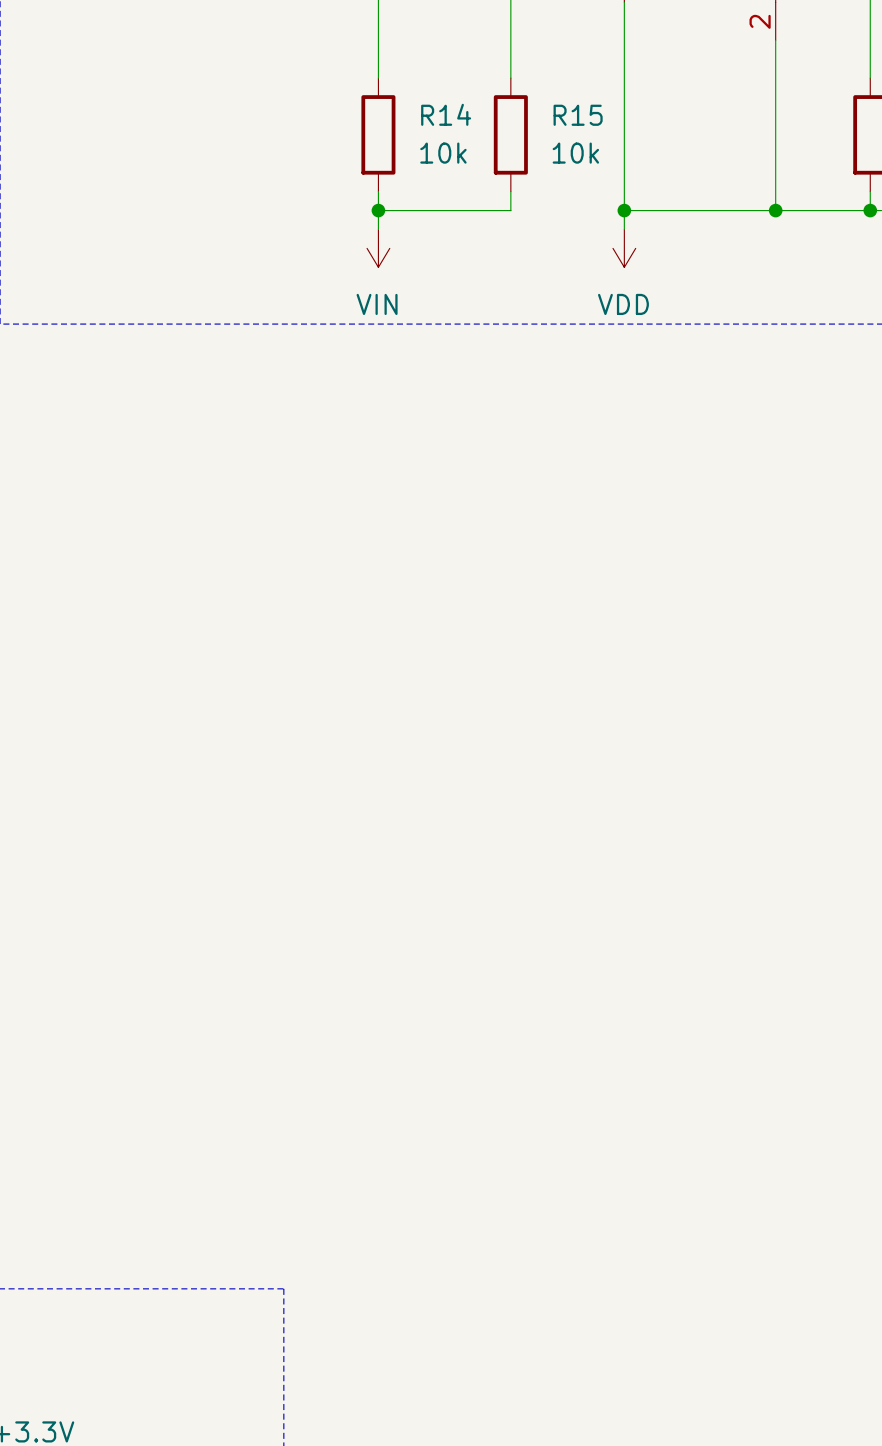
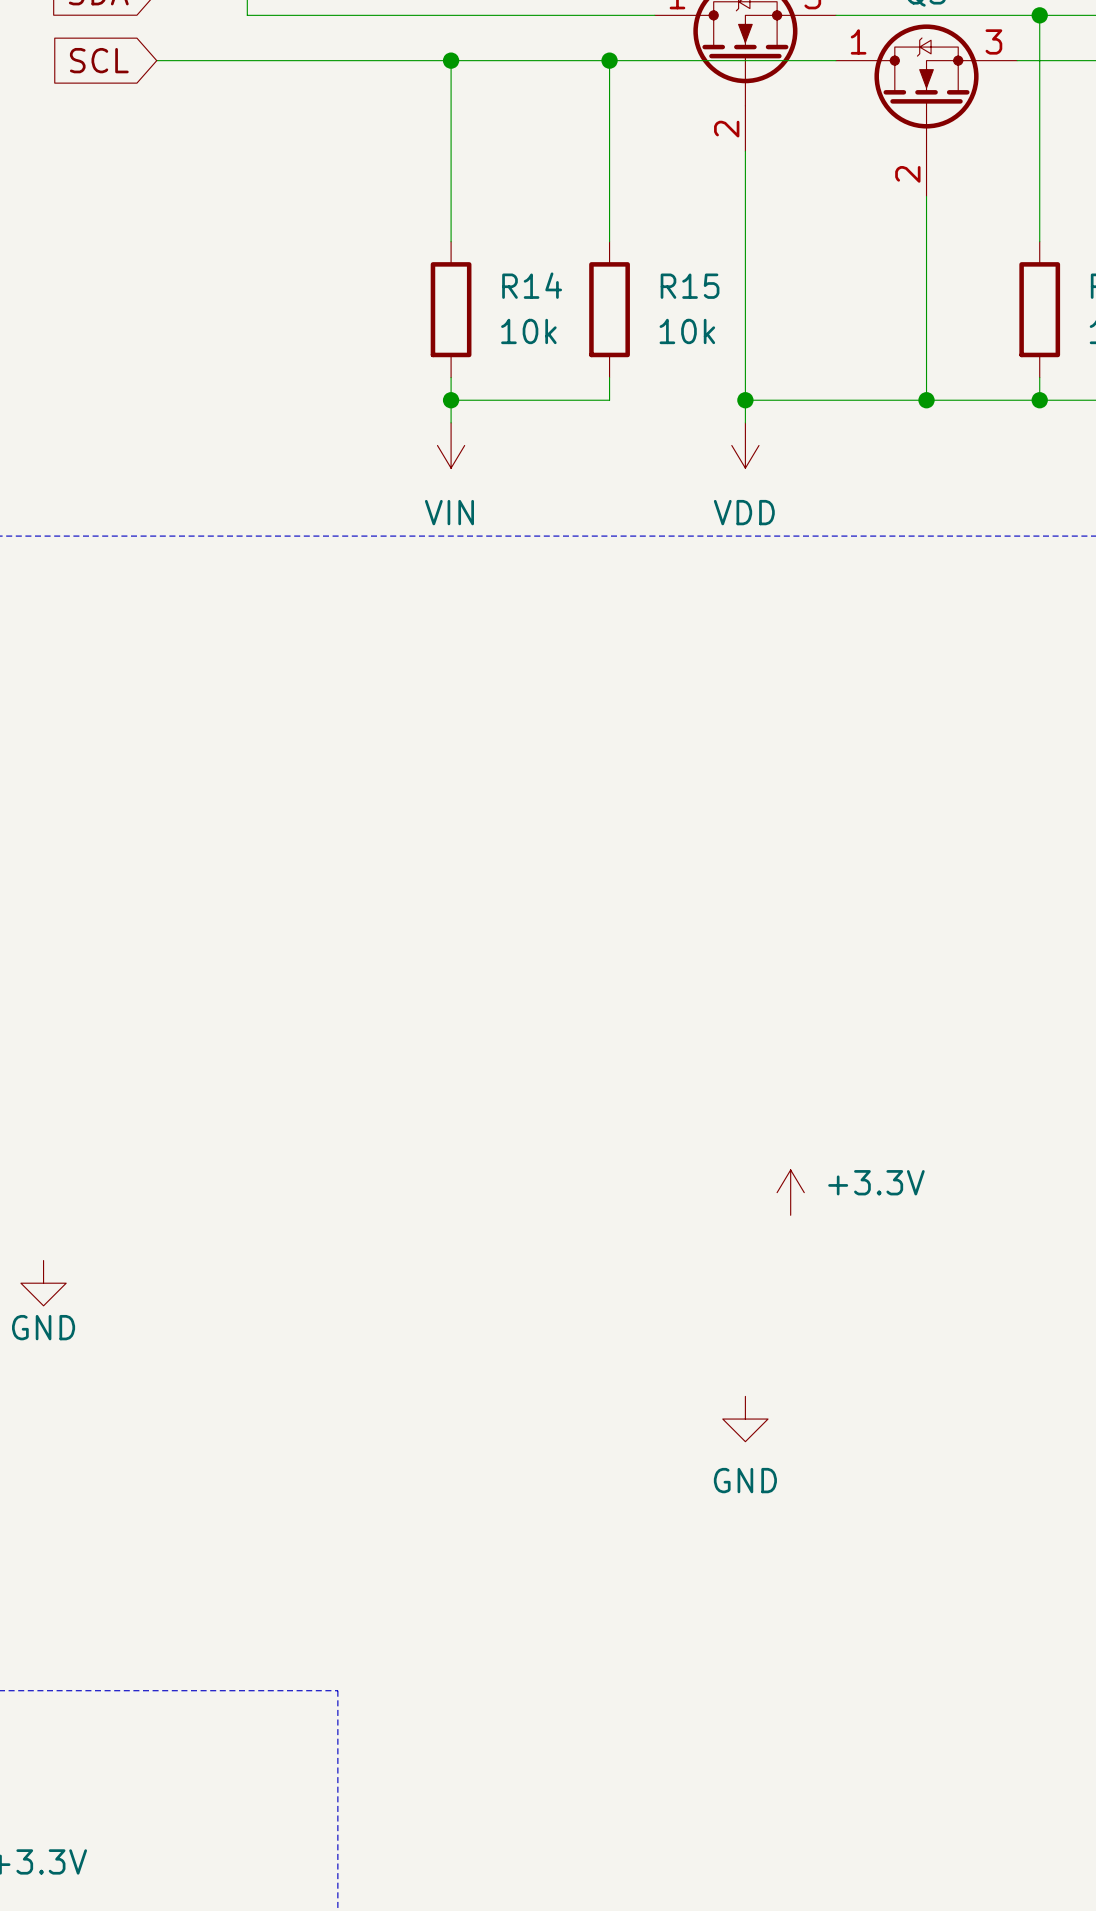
power symbol: none -> +3.3V (790, 1192)
power symbol: none -> GND (43, 1283)
power symbol: none -> GND (745, 1419)

